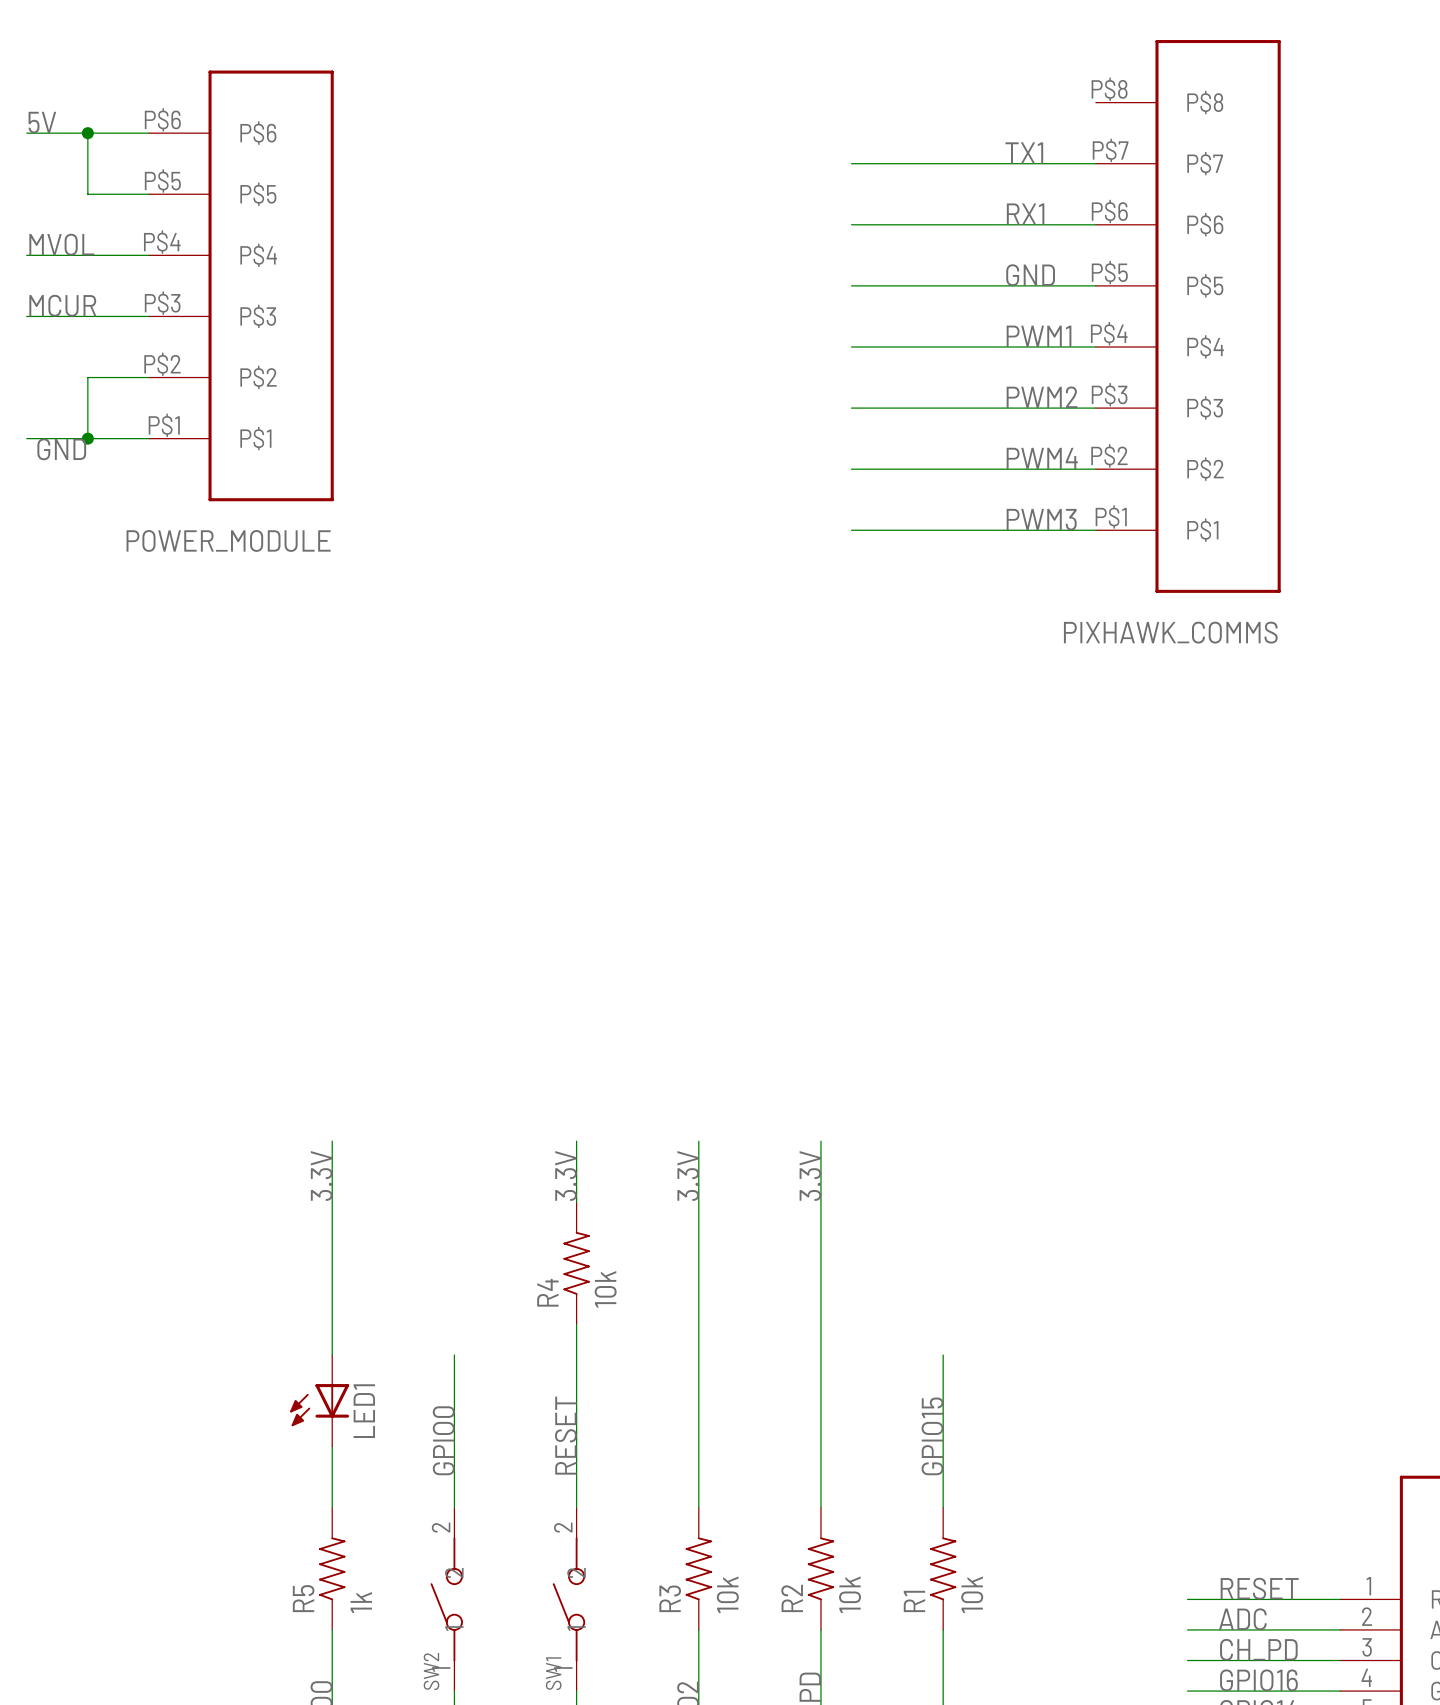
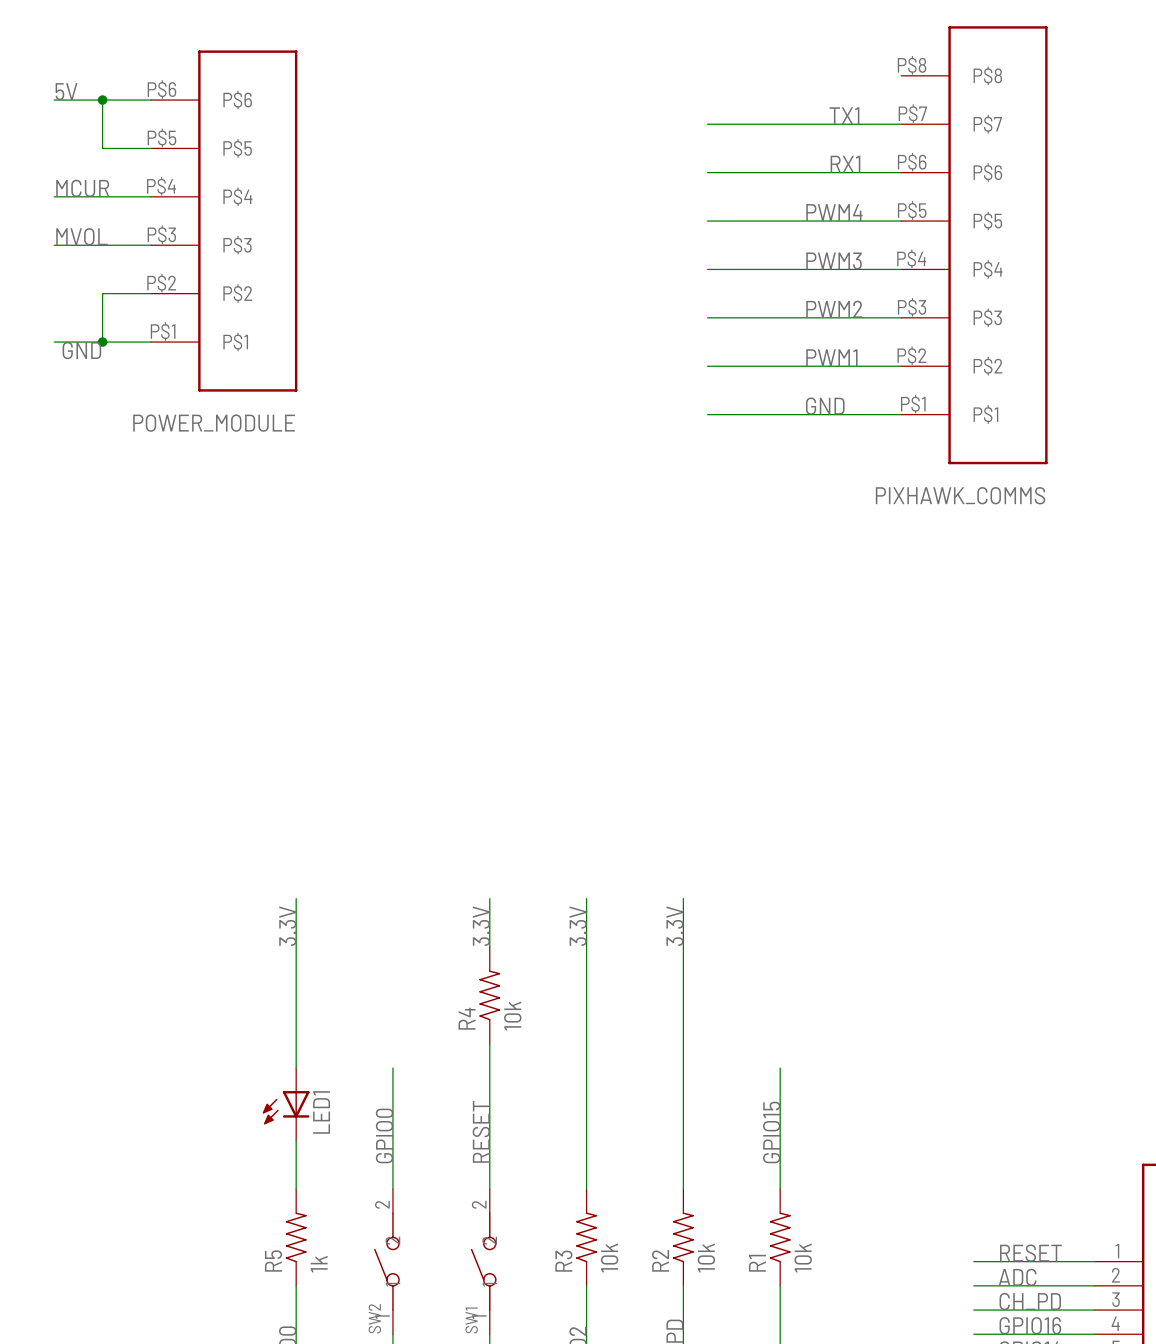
label: MVOL (61, 244) -> MCUR (82, 188)
label position: GND (1030, 275) -> GND (825, 406)
label: MCUR (62, 305) -> MVOL (81, 236)
label position: PWM1 (1039, 336) -> PWM1 (831, 357)
label position: PWM2 (1042, 397) -> PWM2 (834, 309)
label position: PWM4 (1042, 458) -> PWM4 (834, 212)
label position: PWM3 (1041, 519) -> PWM3 (834, 261)

